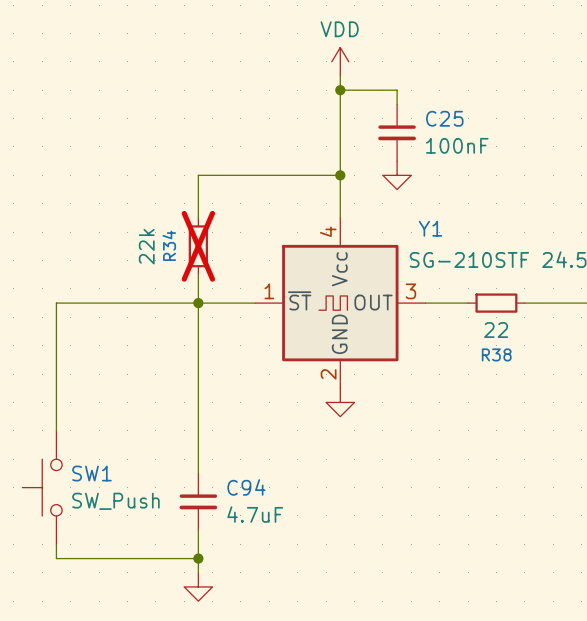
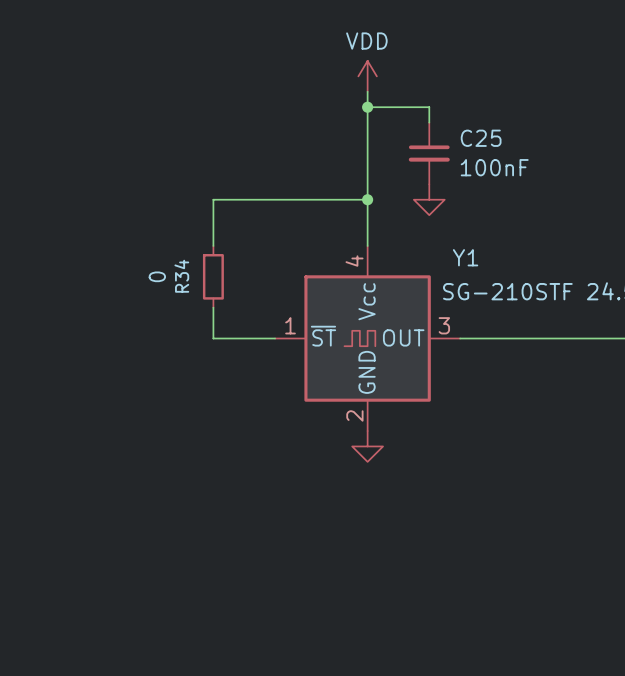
R34 value: 22k (146, 246) -> 0 (157, 276)
R34 do-not-place cross: (198, 246) -> none
junction: (198, 303) -> none
wire: none -> (506, 338) (568, 338)
R38: 22 (496, 303) -> none
wire: (56, 430) (56, 303) (198, 303) (198, 473) -> none
SW1: SW_Push (42, 487) -> none
C94: 4.7uF (198, 501) -> none
wire: (198, 530) (198, 572) -> none
wire: (56, 544) (56, 558) (198, 558) -> none
junction: (198, 558) -> none
power symbol: (198, 586) -> none

